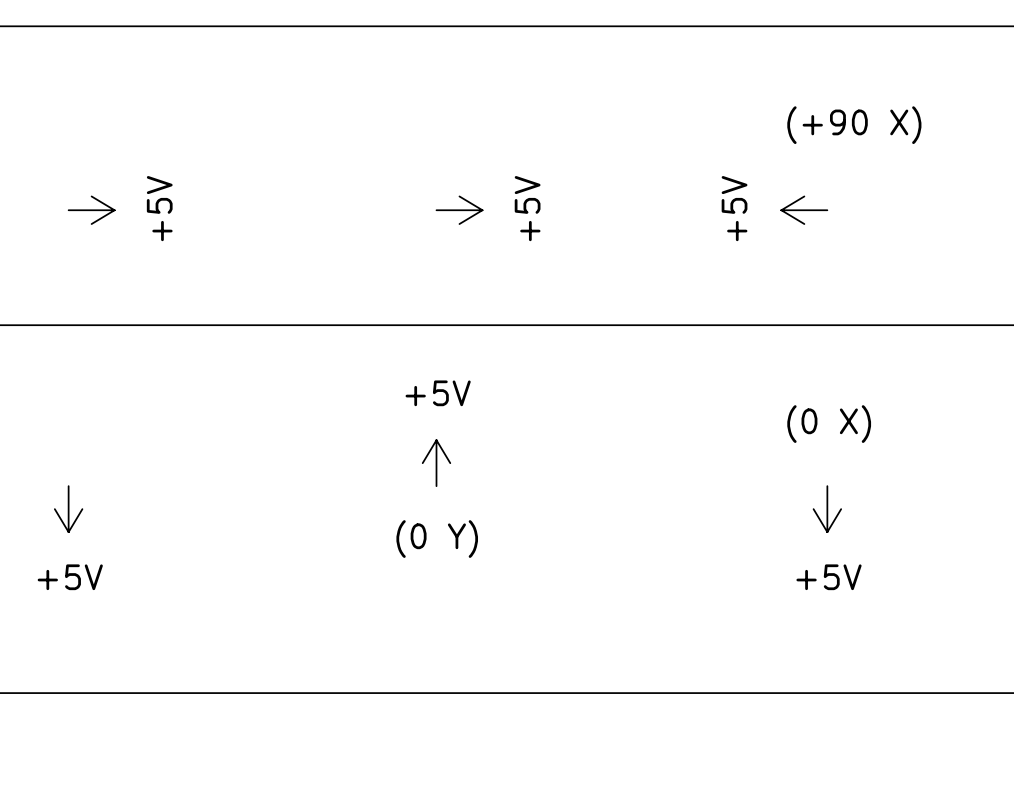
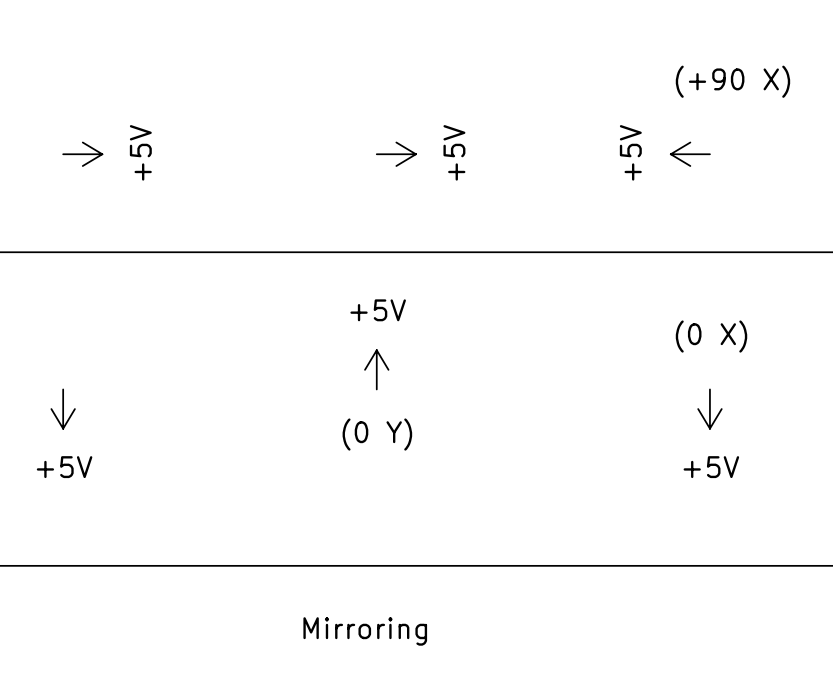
text: none -> Mirroring (365, 631)

